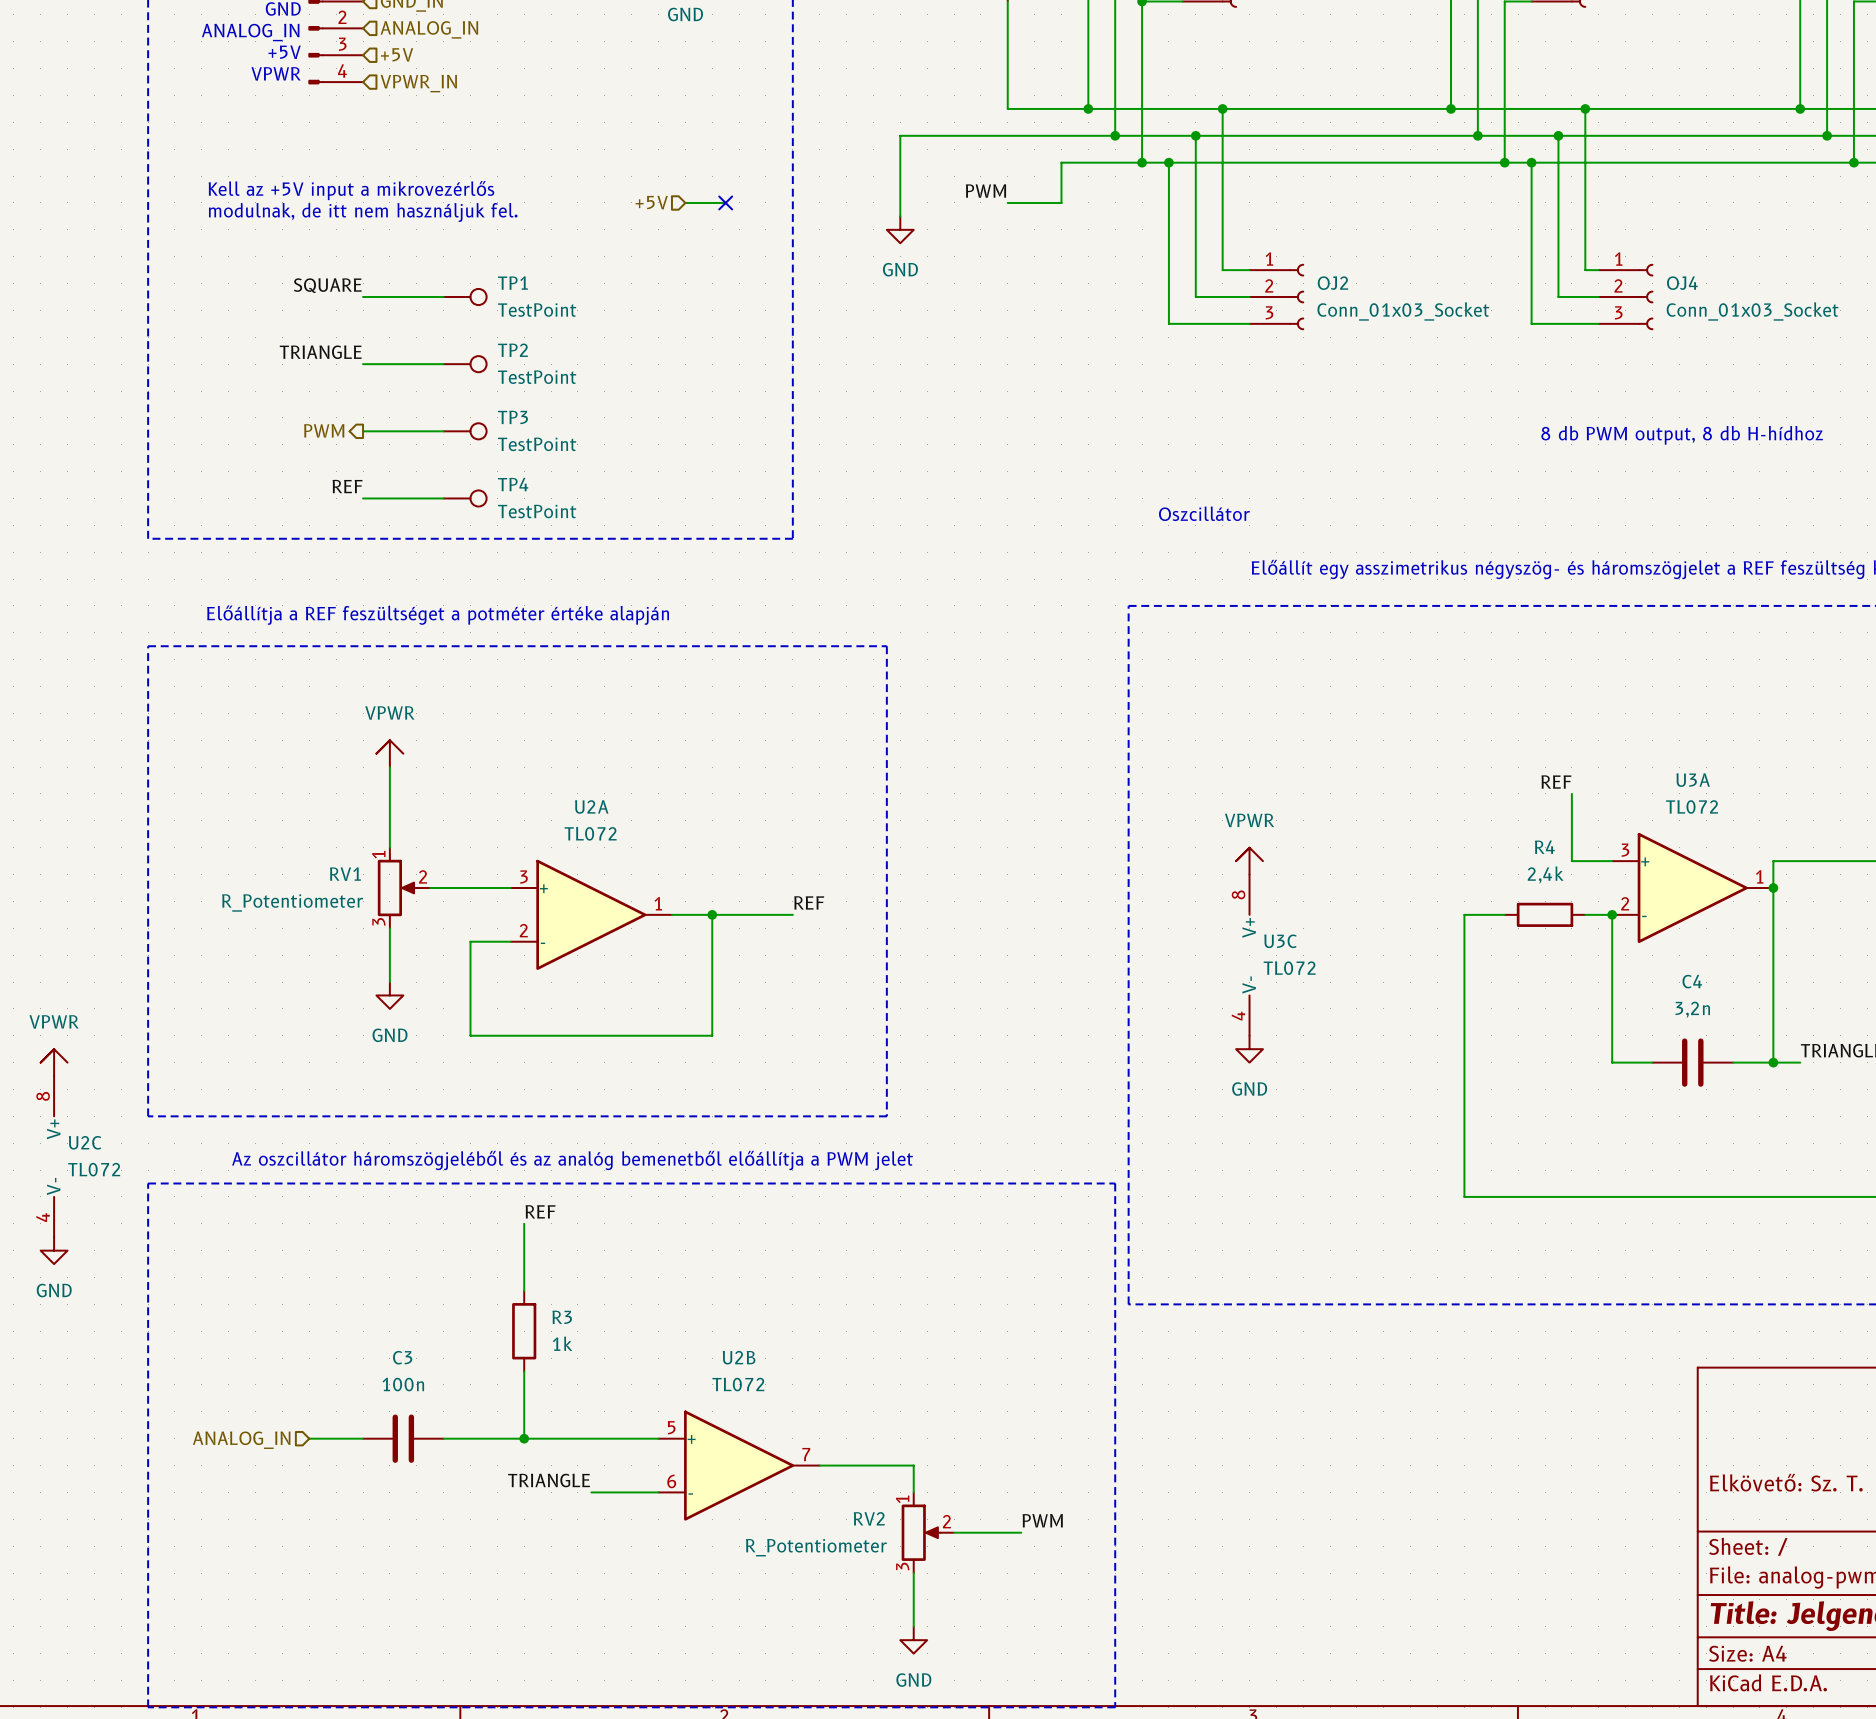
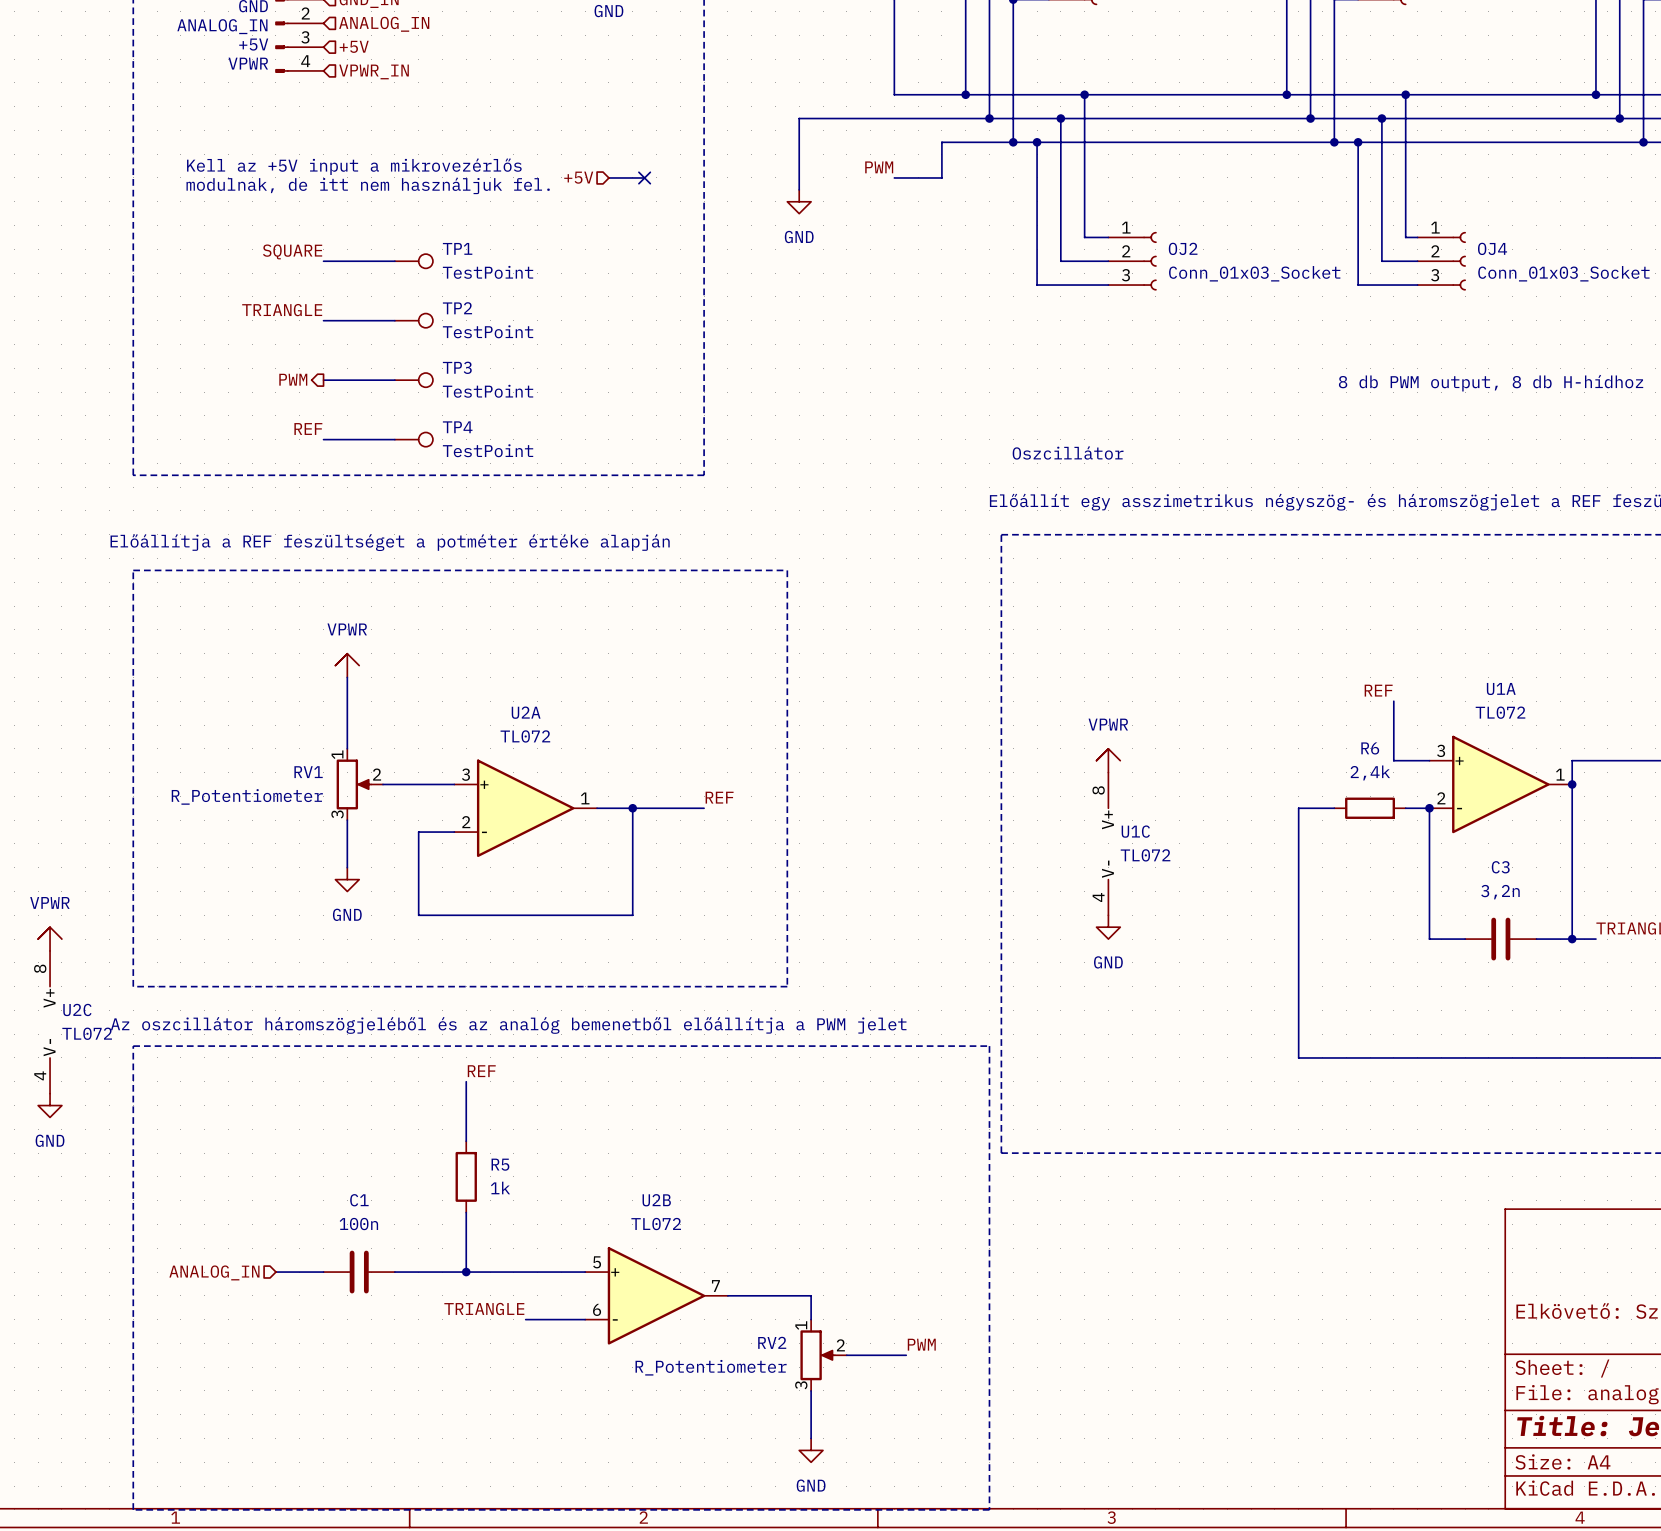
U3A name: U3A (1693, 780) -> U1A (1501, 689)
R4 name: R4 (1544, 847) -> R6 (1370, 748)
U3C name: U3C (1280, 941) -> U1C (1135, 831)
C4 name: C4 (1692, 981) -> C3 (1500, 867)
R3 name: R3 (562, 1317) -> R5 (500, 1164)
C3 name: C3 (402, 1357) -> C1 (359, 1200)

